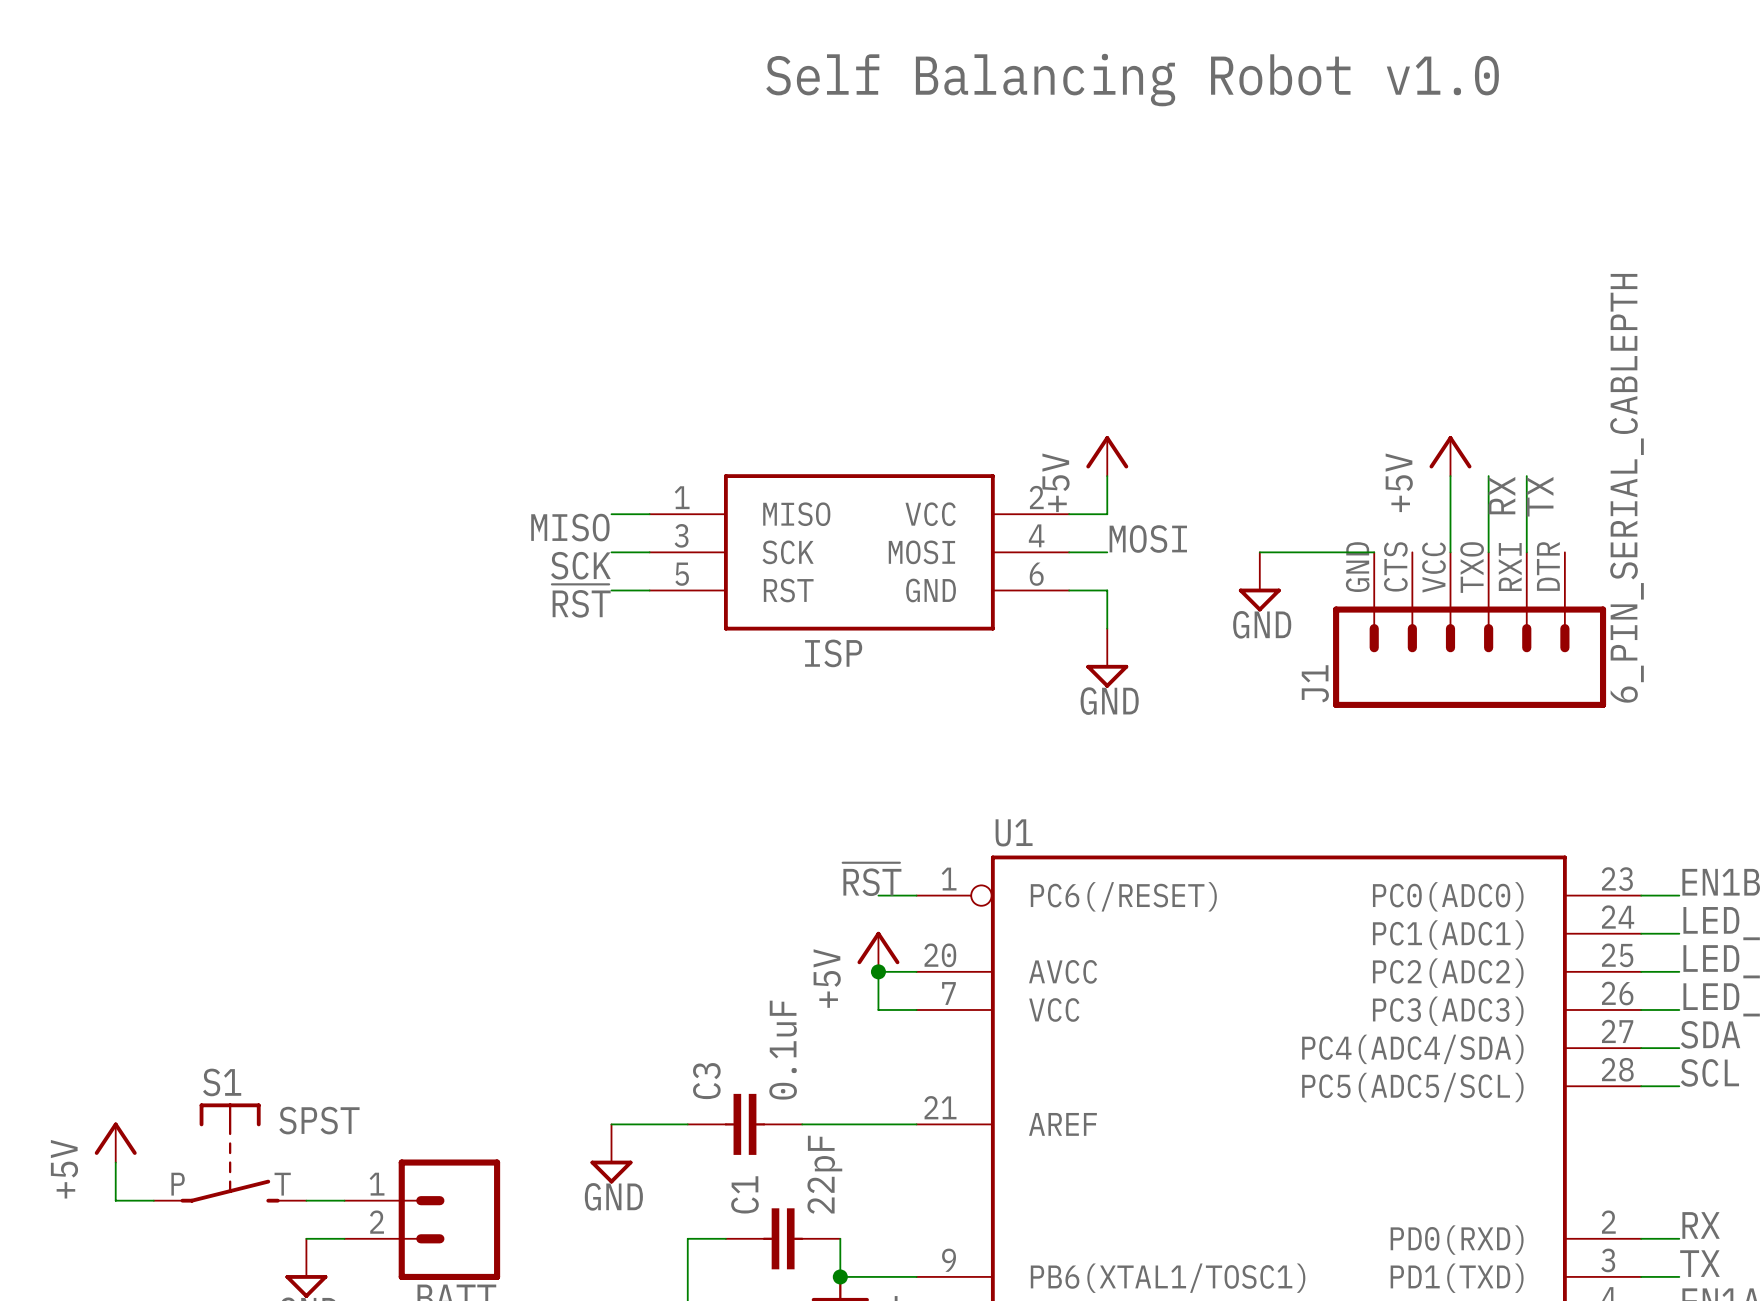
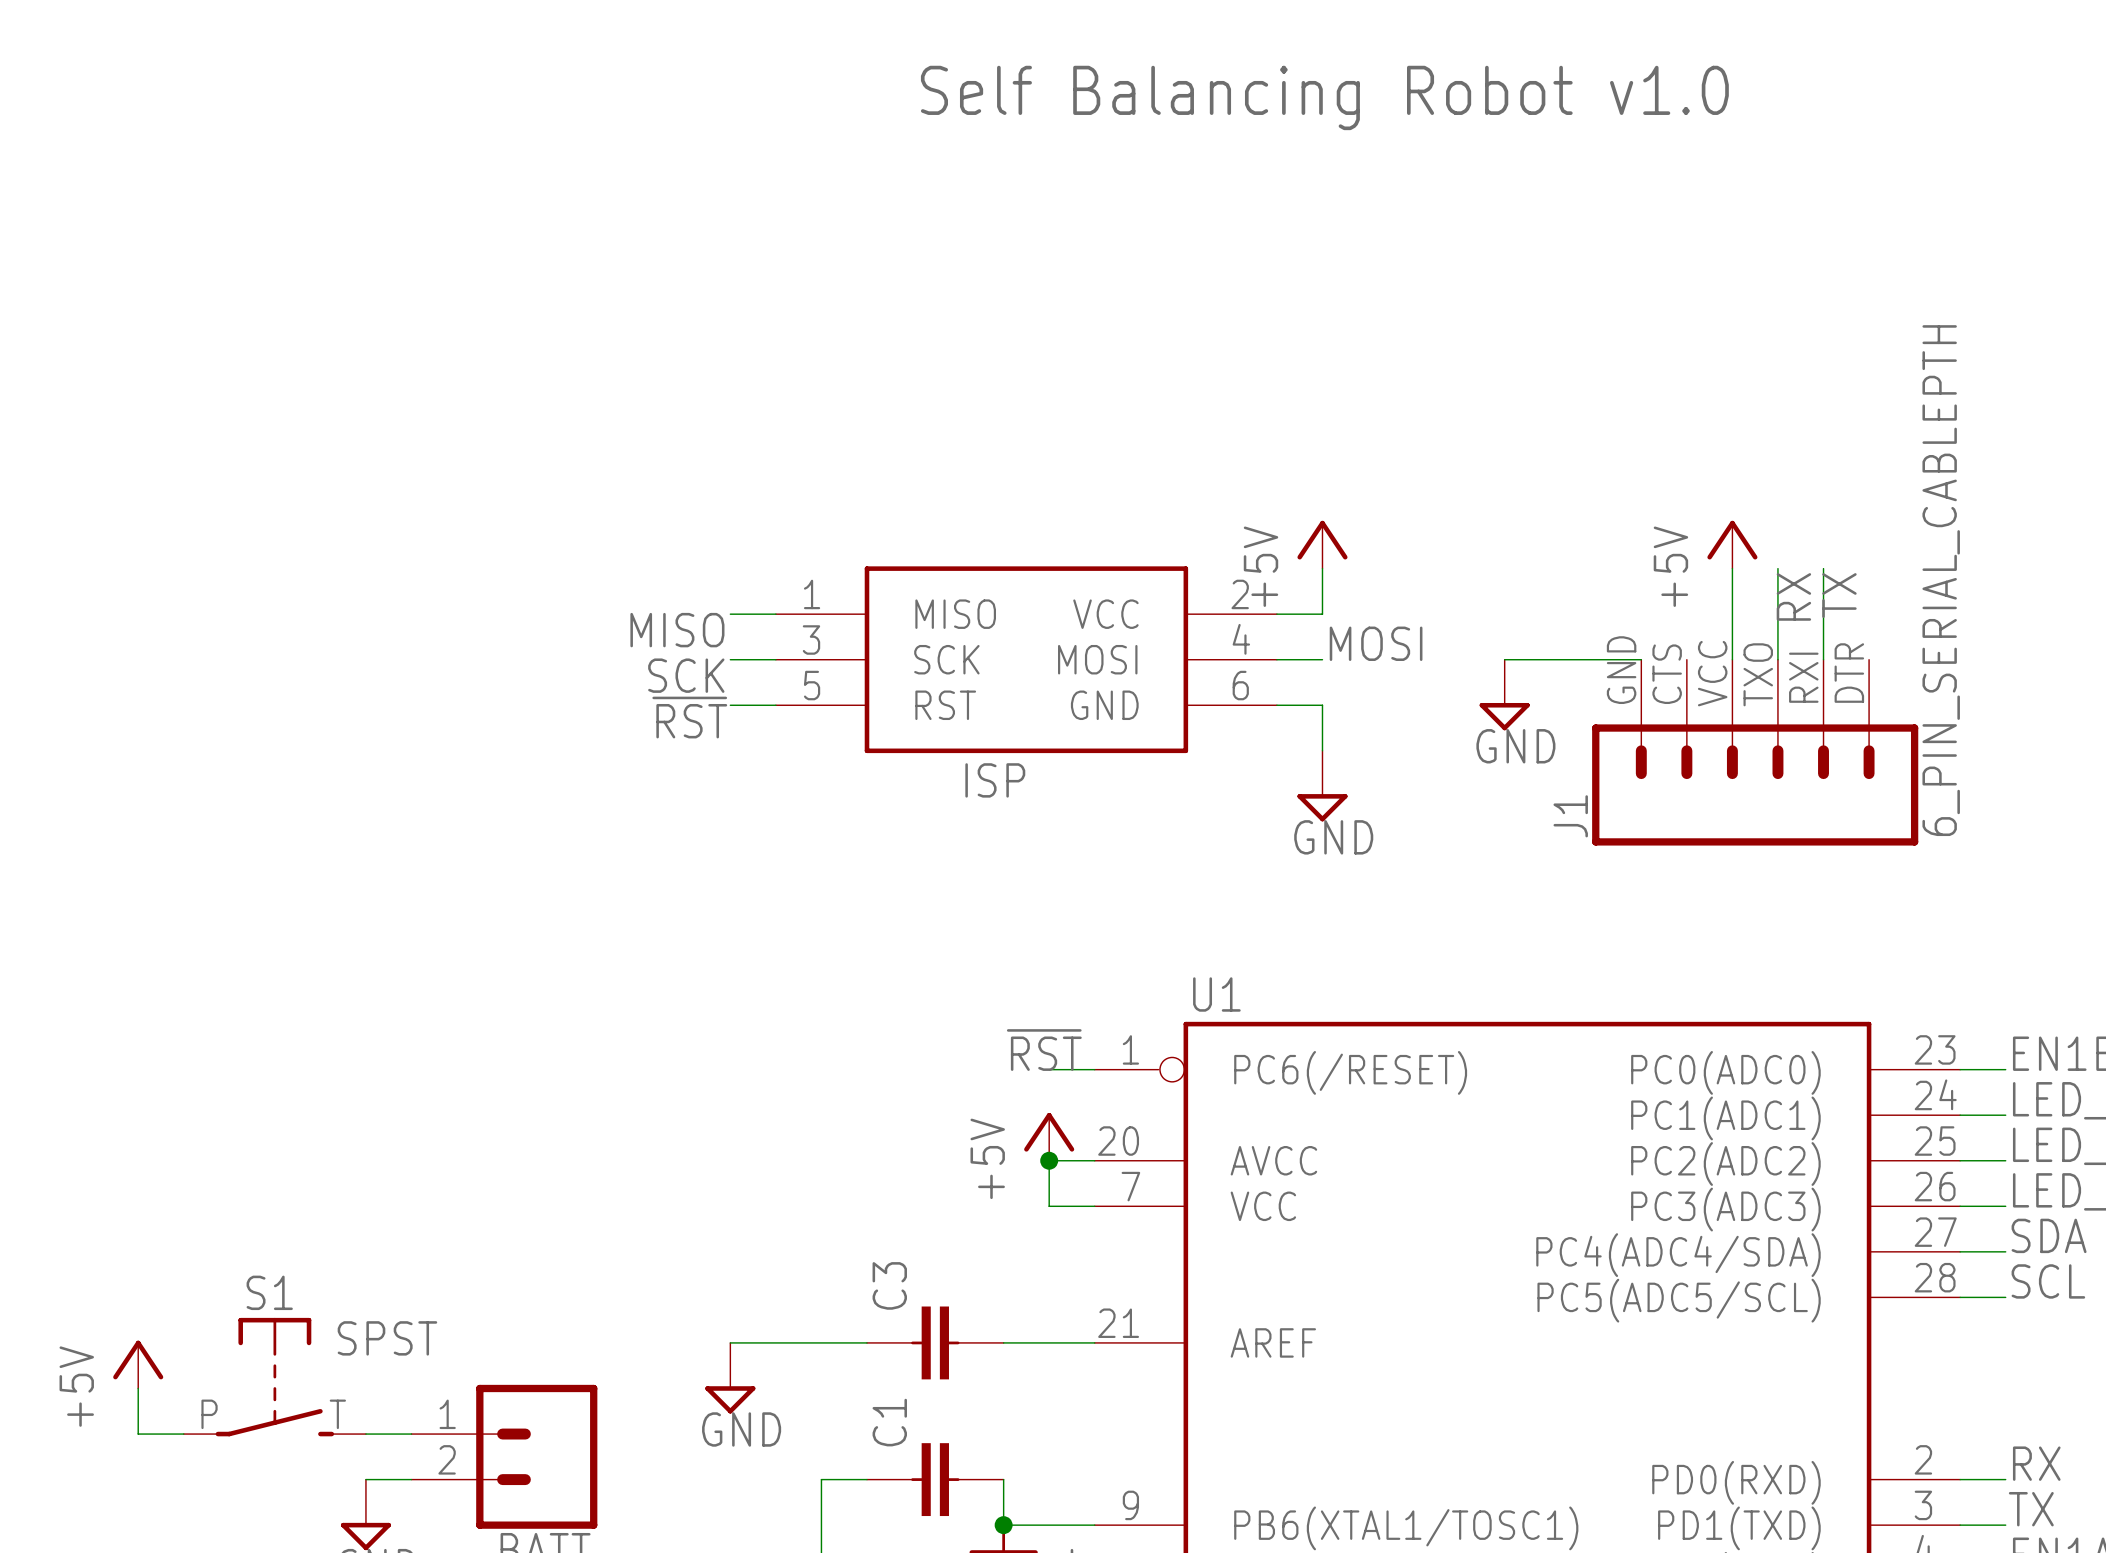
C3 value: 0.1uF (783, 1050) -> none
C3 position: (744, 1124) -> (935, 1342)
C1 value: 22pF (824, 1174) -> none

